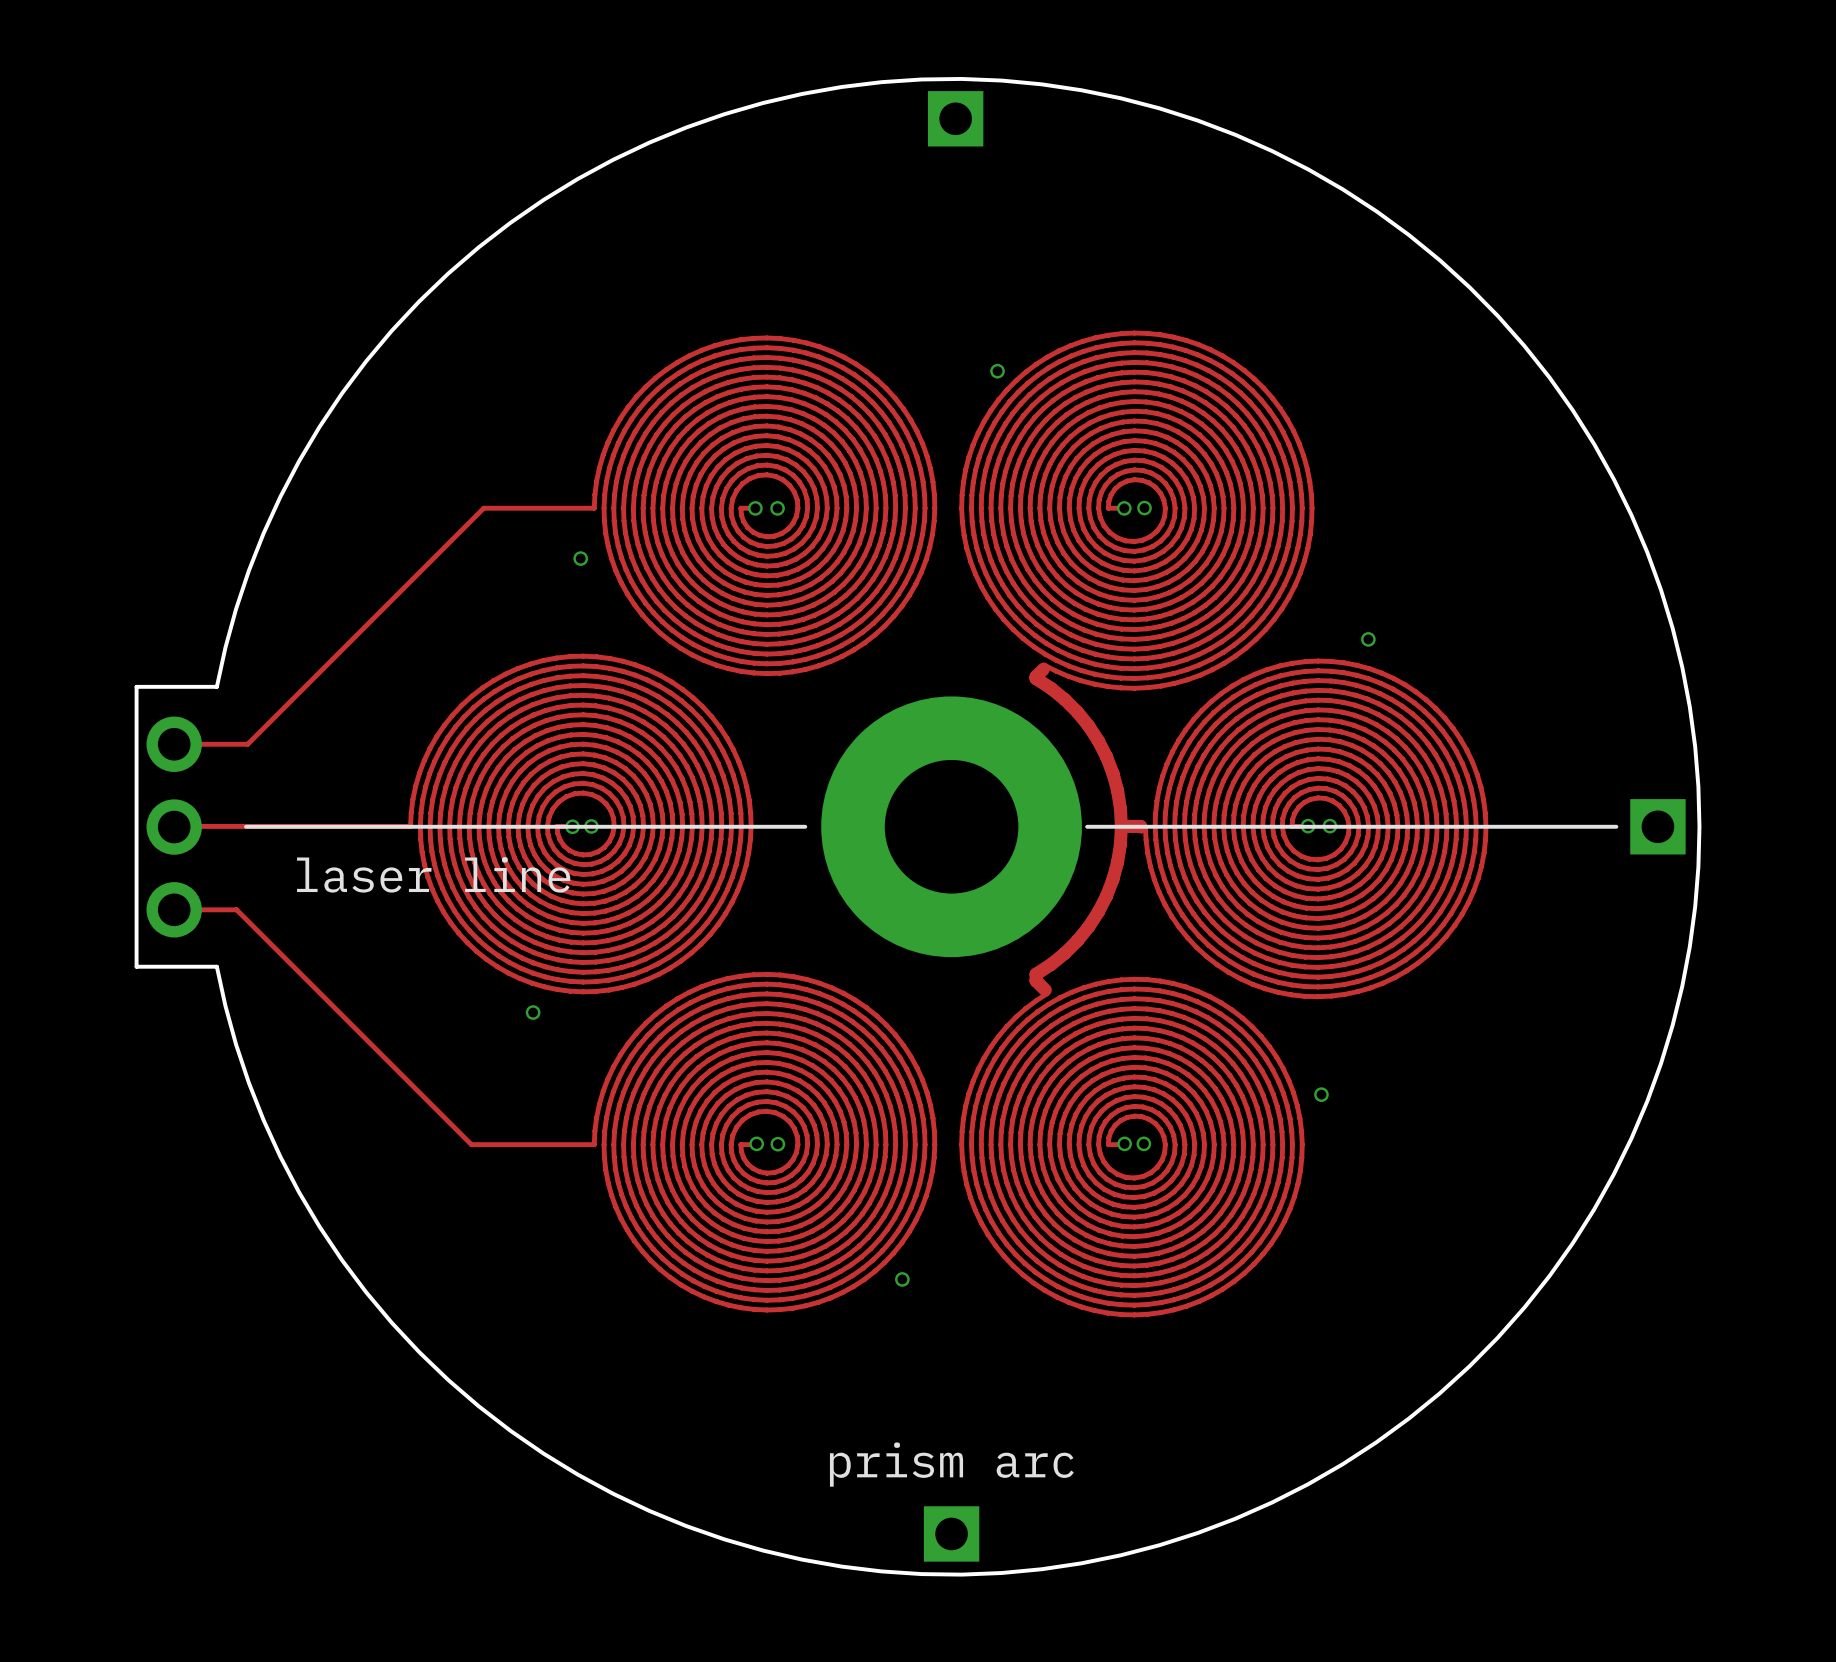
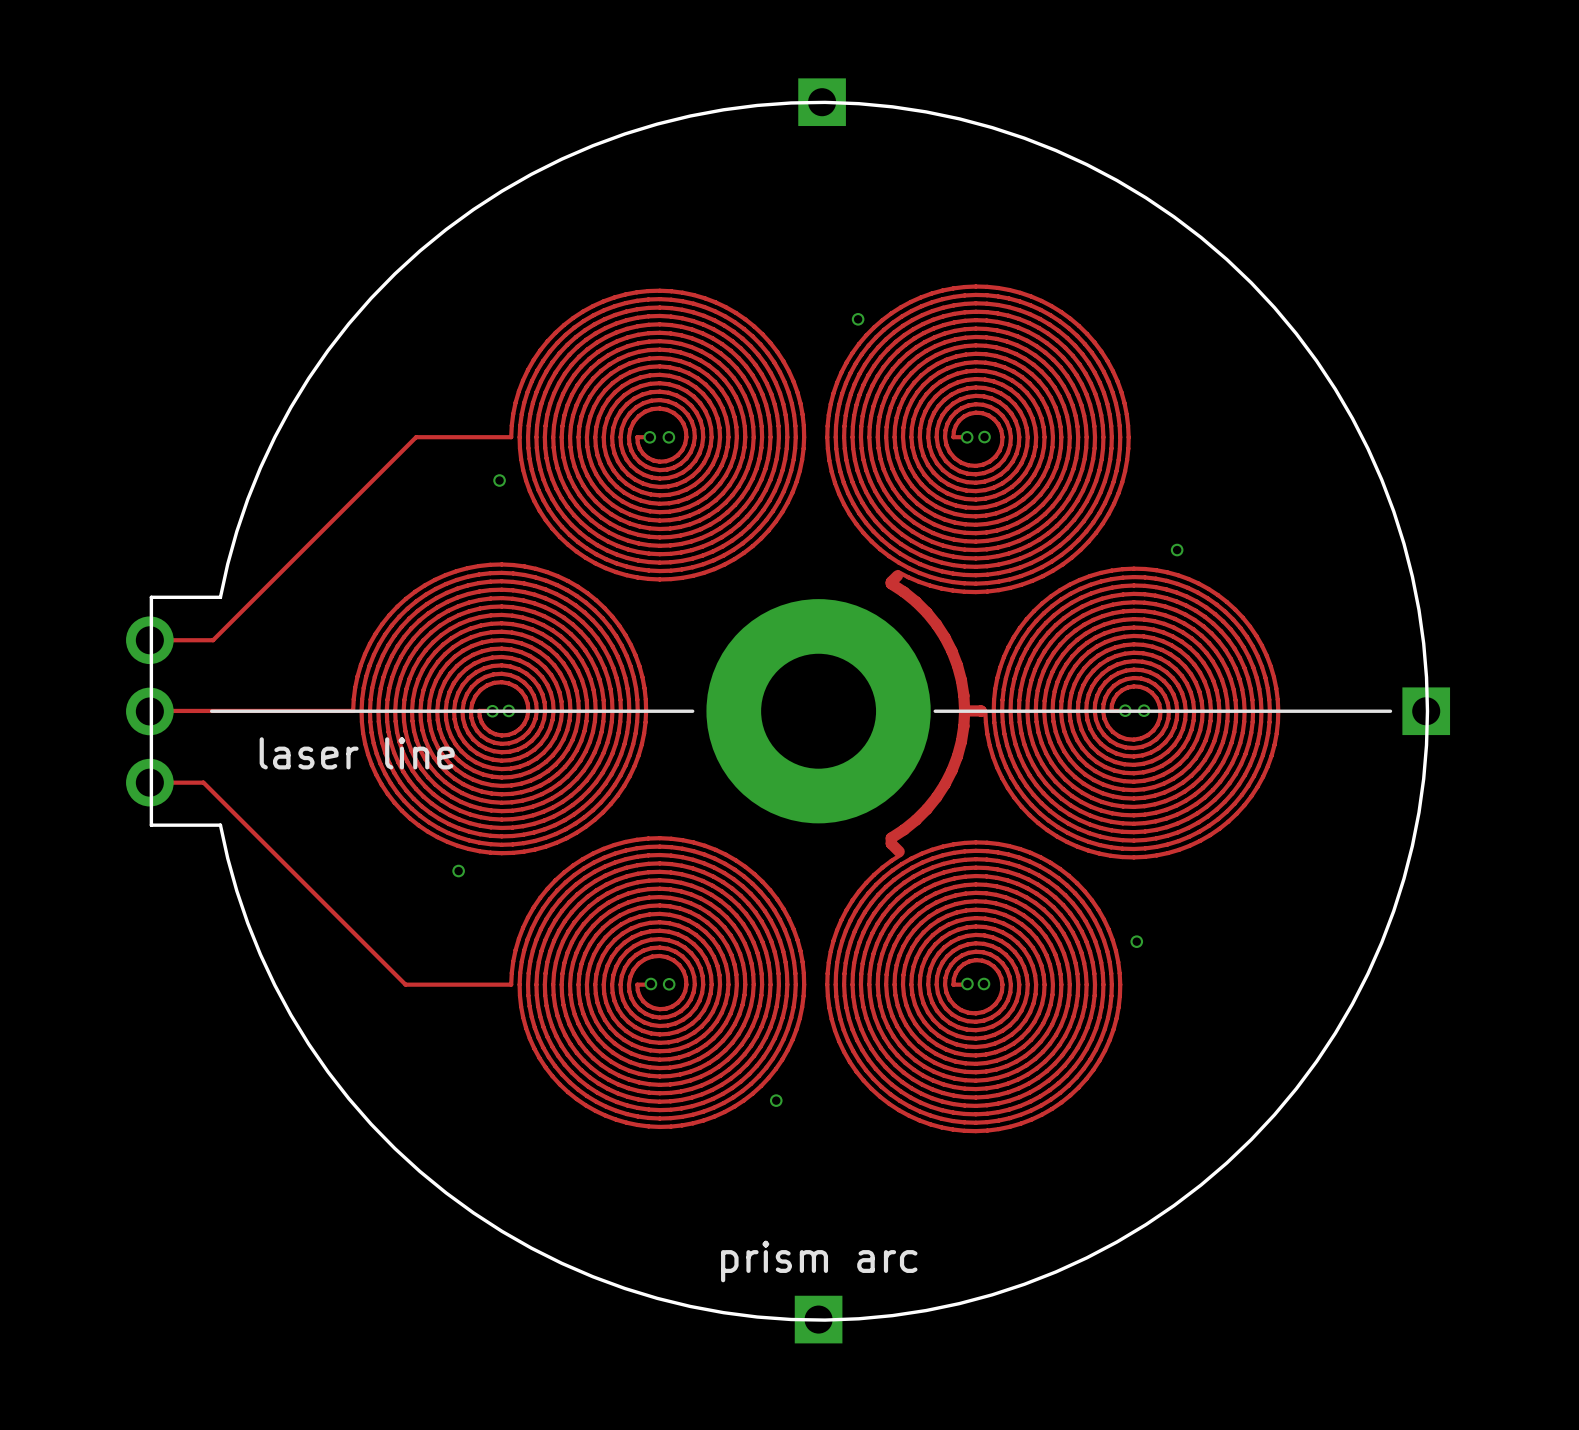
board edge: (136, 686) (136, 966) (216, 966) (236, 1044) (263, 1120) (298, 1192) (319, 1226) (366, 1292) (419, 1352) (478, 1406) (543, 1453) (577, 1474) (649, 1510) (724, 1539) (802, 1559) (841, 1566) (921, 1574) (1001, 1573) (1081, 1563) (1120, 1555) (1197, 1532) (1272, 1502) (1342, 1464) (1376, 1442) (1440, 1393) (1497, 1337) (1549, 1276) (1572, 1243) (1613, 1174) (1647, 1101) (1672, 1025) (1689, 946) (1695, 906) (1699, 826) (1695, 746) (1682, 667) (1661, 589) (1631, 515) (1613, 479) (1572, 410) (1524, 346) (1469, 287) (1408, 234) (1376, 211) (1308, 169) (1235, 134) (1159, 108) (1081, 90) (1001, 80) (961, 78) (881, 82) (802, 93) (724, 114) (649, 142) (577, 179) (543, 200) (478, 247) (419, 301) (366, 361) (319, 426) (280, 496) (263, 533) (236, 608) (216, 686) (136, 686) -> (151, 597) (151, 825) (220, 825) (236, 890) (247, 923) (274, 985) (308, 1044) (348, 1098) (371, 1124) (419, 1171) (473, 1212) (531, 1248) (561, 1263) (624, 1288) (657, 1298) (723, 1312) (757, 1317) (824, 1320) (892, 1315) (959, 1303) (992, 1294) (1056, 1271) (1116, 1242) (1174, 1205) (1226, 1162) (1274, 1114) (1316, 1061) (1335, 1033) (1367, 973) (1393, 911) (1403, 878) (1418, 812) (1423, 778) (1427, 711) (1423, 643) (1412, 576) (1403, 543) (1381, 479) (1352, 418) (1316, 360) (1274, 307) (1251, 282) (1201, 237) (1146, 197) (1116, 180) (1056, 150) (992, 127) (926, 111) (858, 103) (824, 102) (757, 105) (690, 116) (624, 133) (592, 145) (561, 159) (502, 191) (446, 229) (394, 273) (348, 323) (308, 378) (274, 437) (260, 467) (236, 531) (220, 597) (151, 597)

